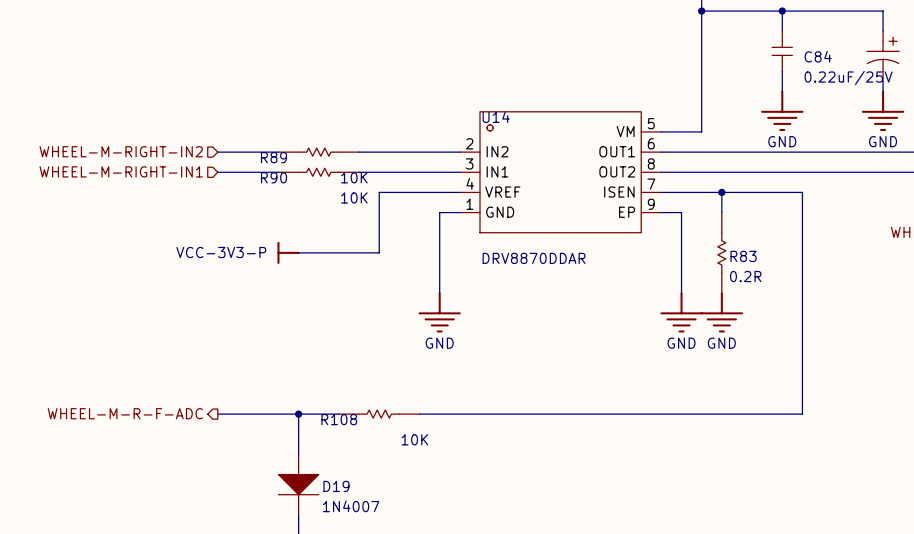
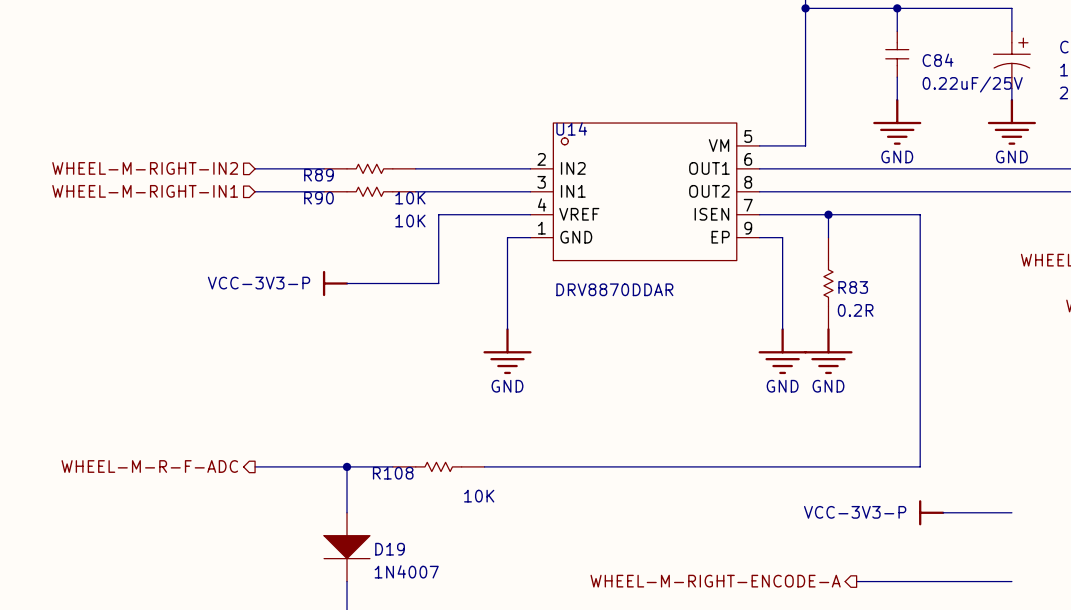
power symbol: none -> VCC-3V3-P (931, 512)
wire: none -> (943, 512) (1011, 512)
hierarchical label: none -> WHEEL-M-RIGHT-ENCODE-A (715, 581)
wire: none -> (856, 581) (1011, 581)

